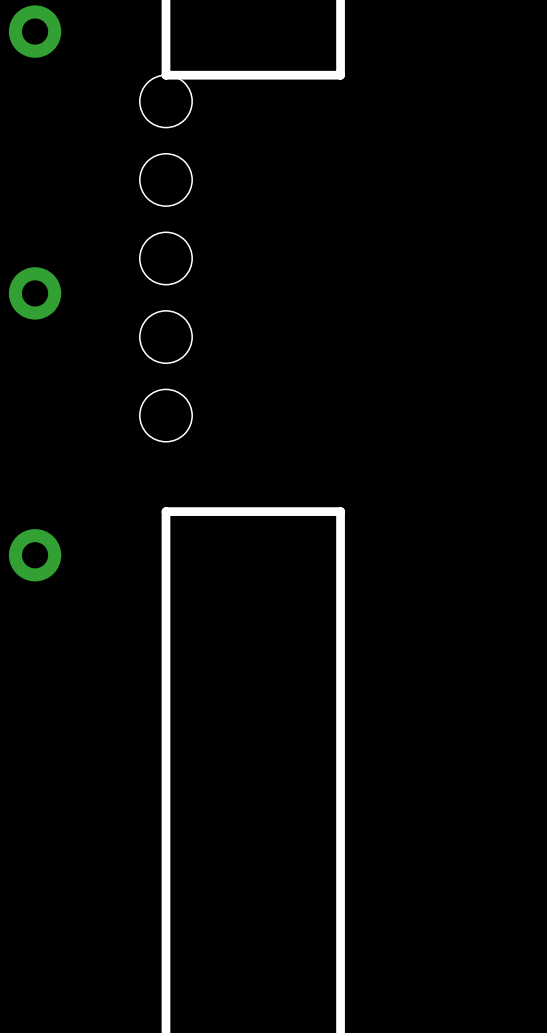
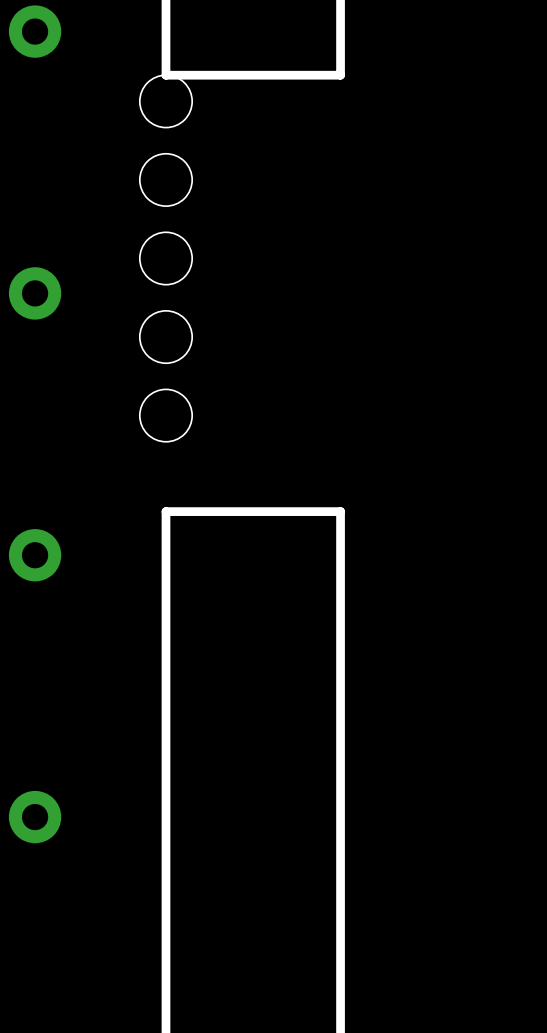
via: none -> (35, 817)

